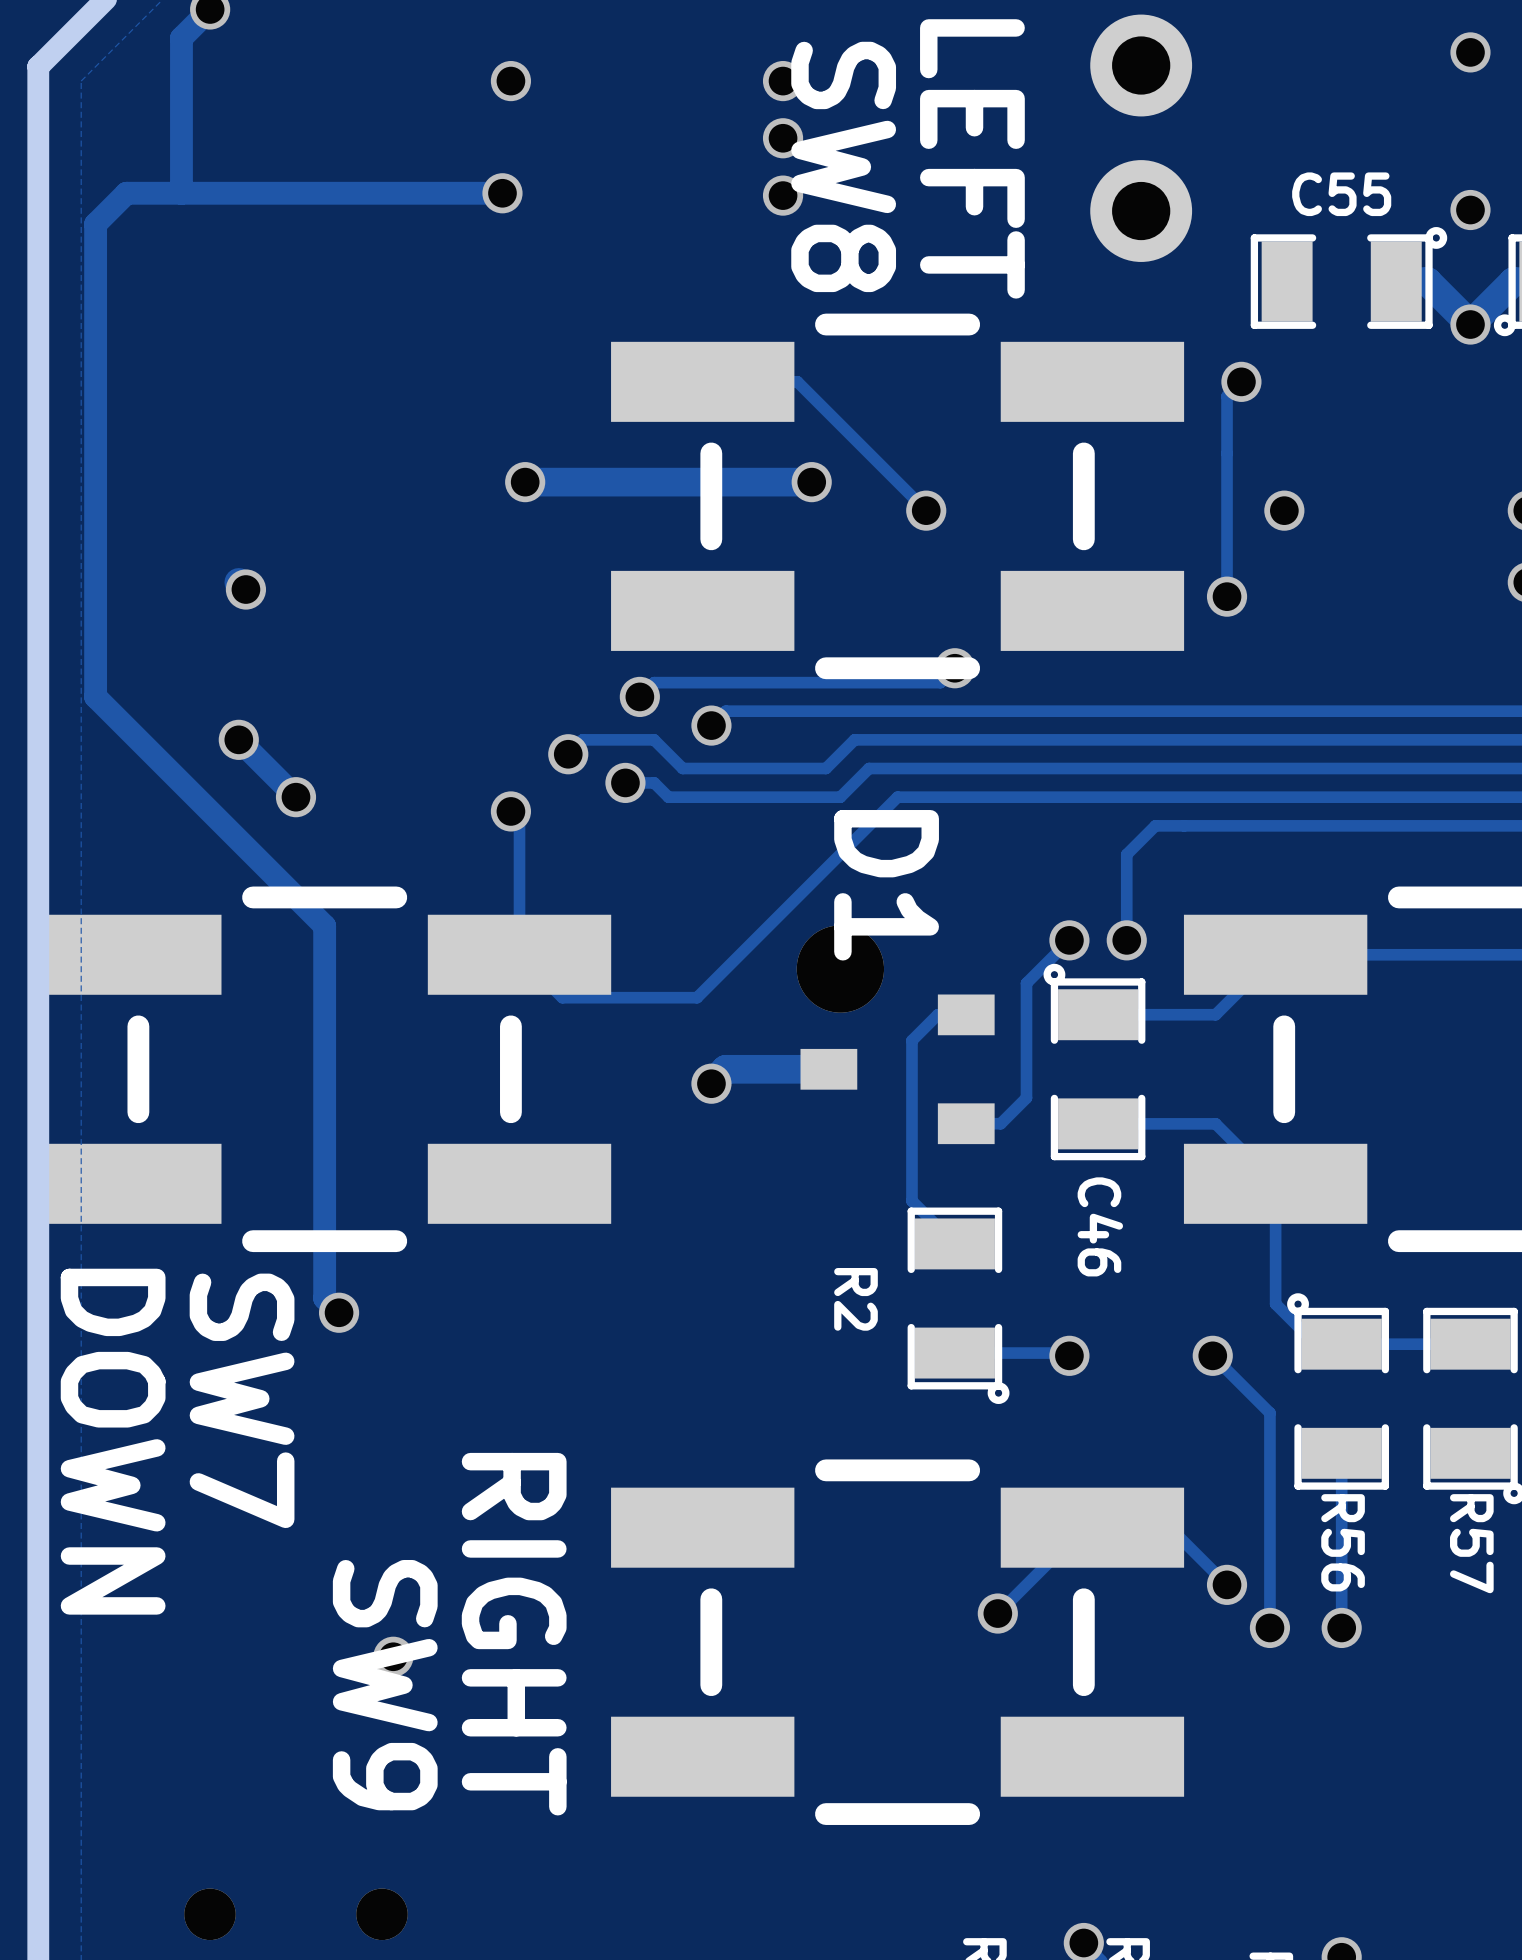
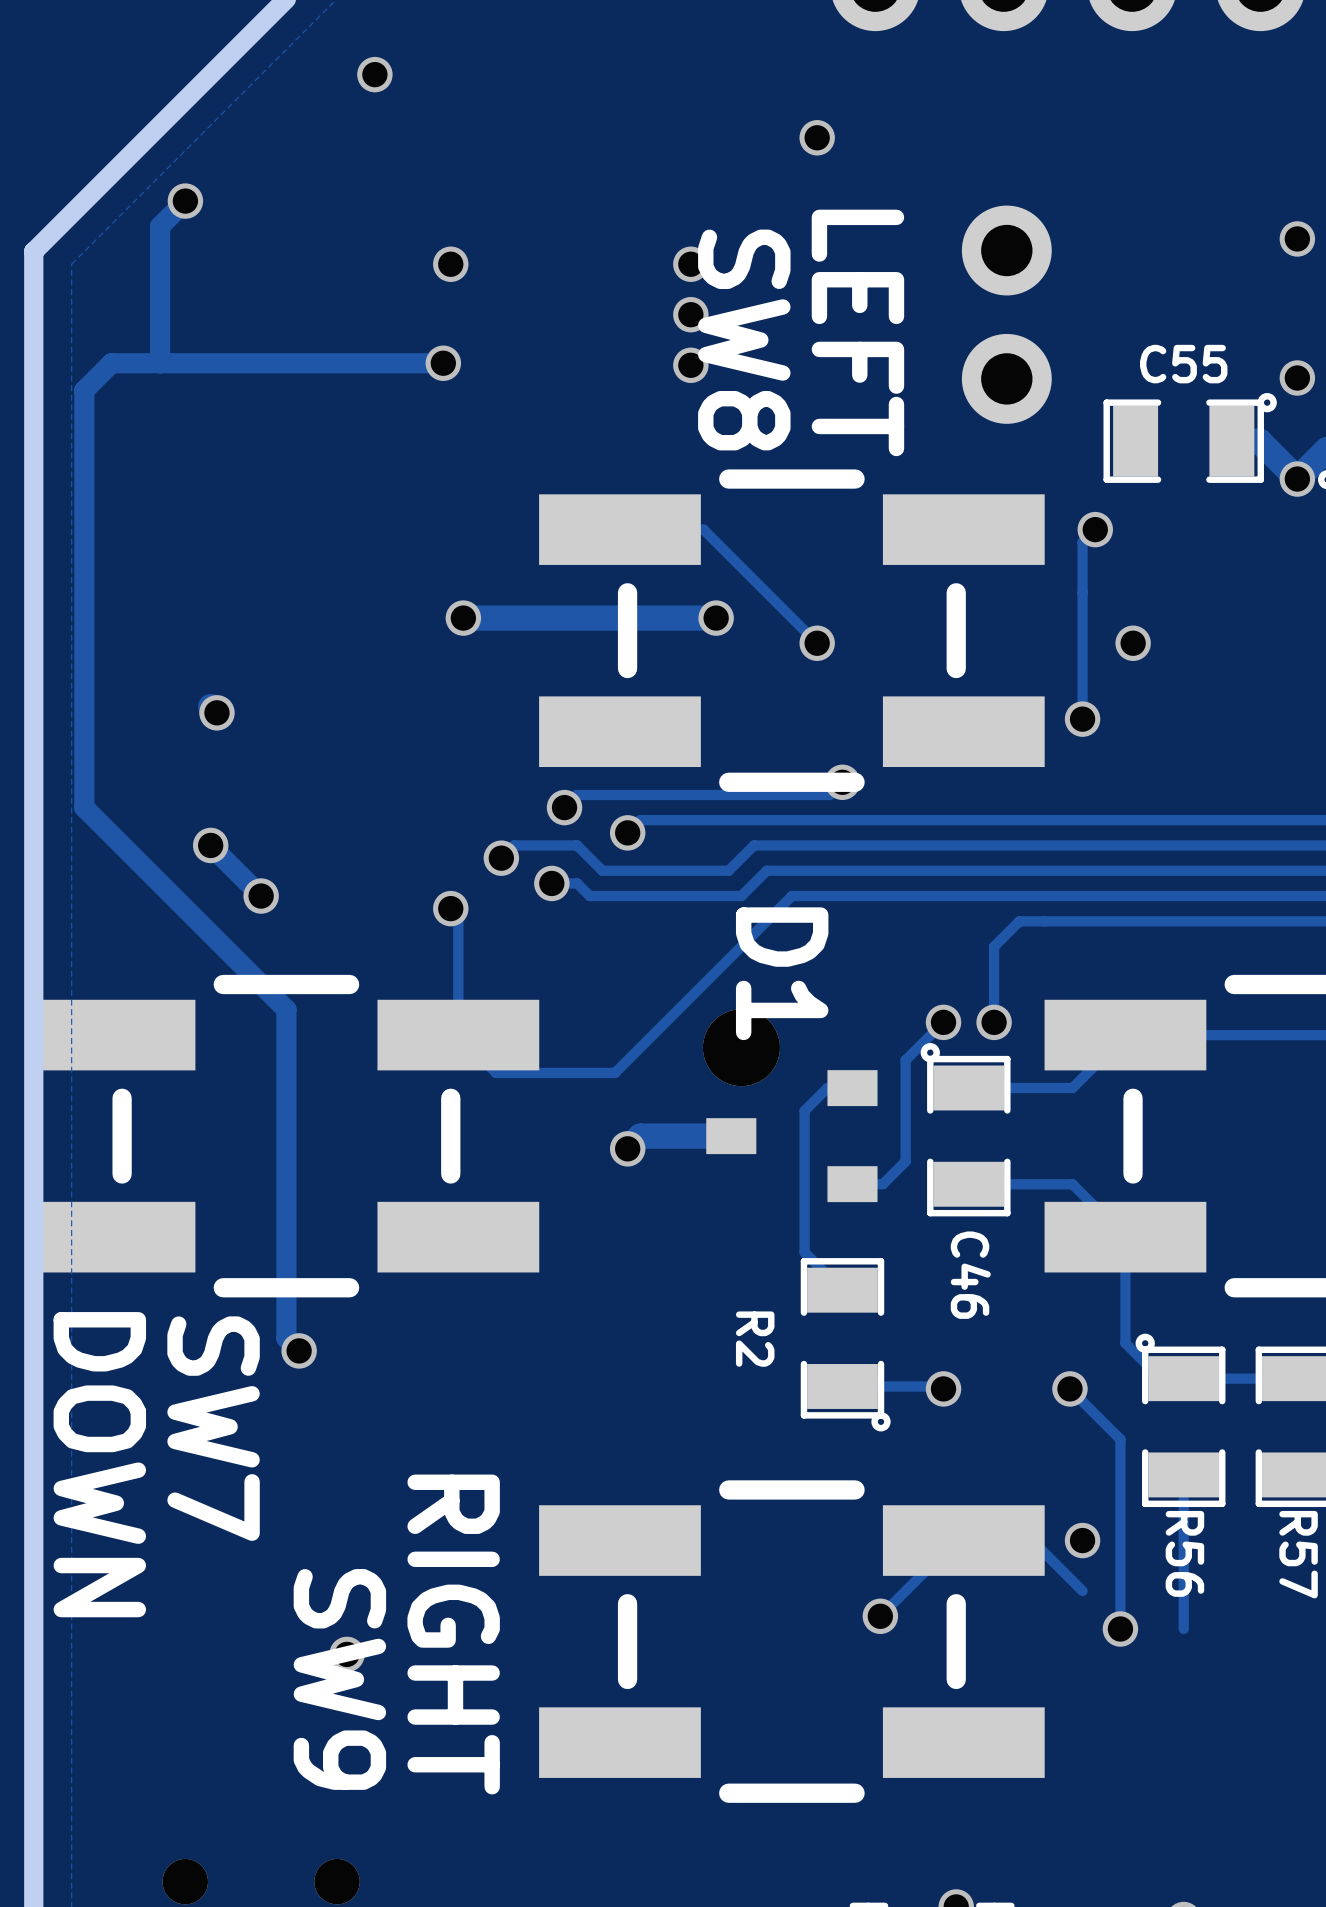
via position: (1227, 1584) -> (1082, 1540)
via: (1341, 1627) -> none

